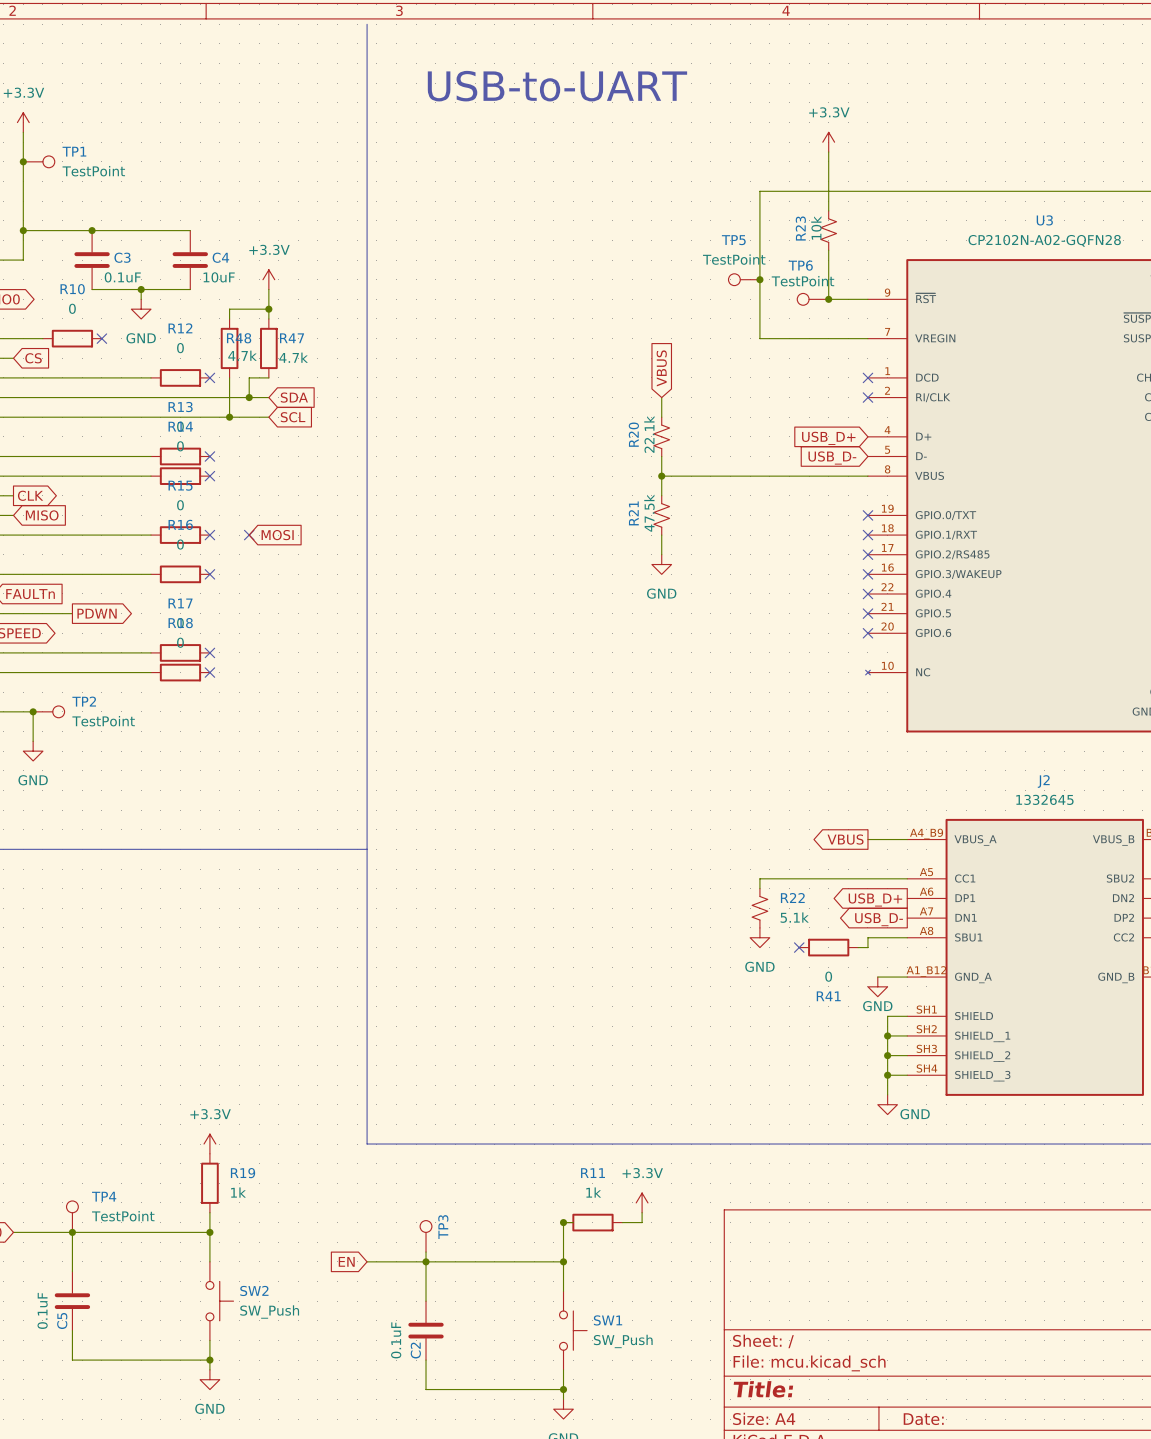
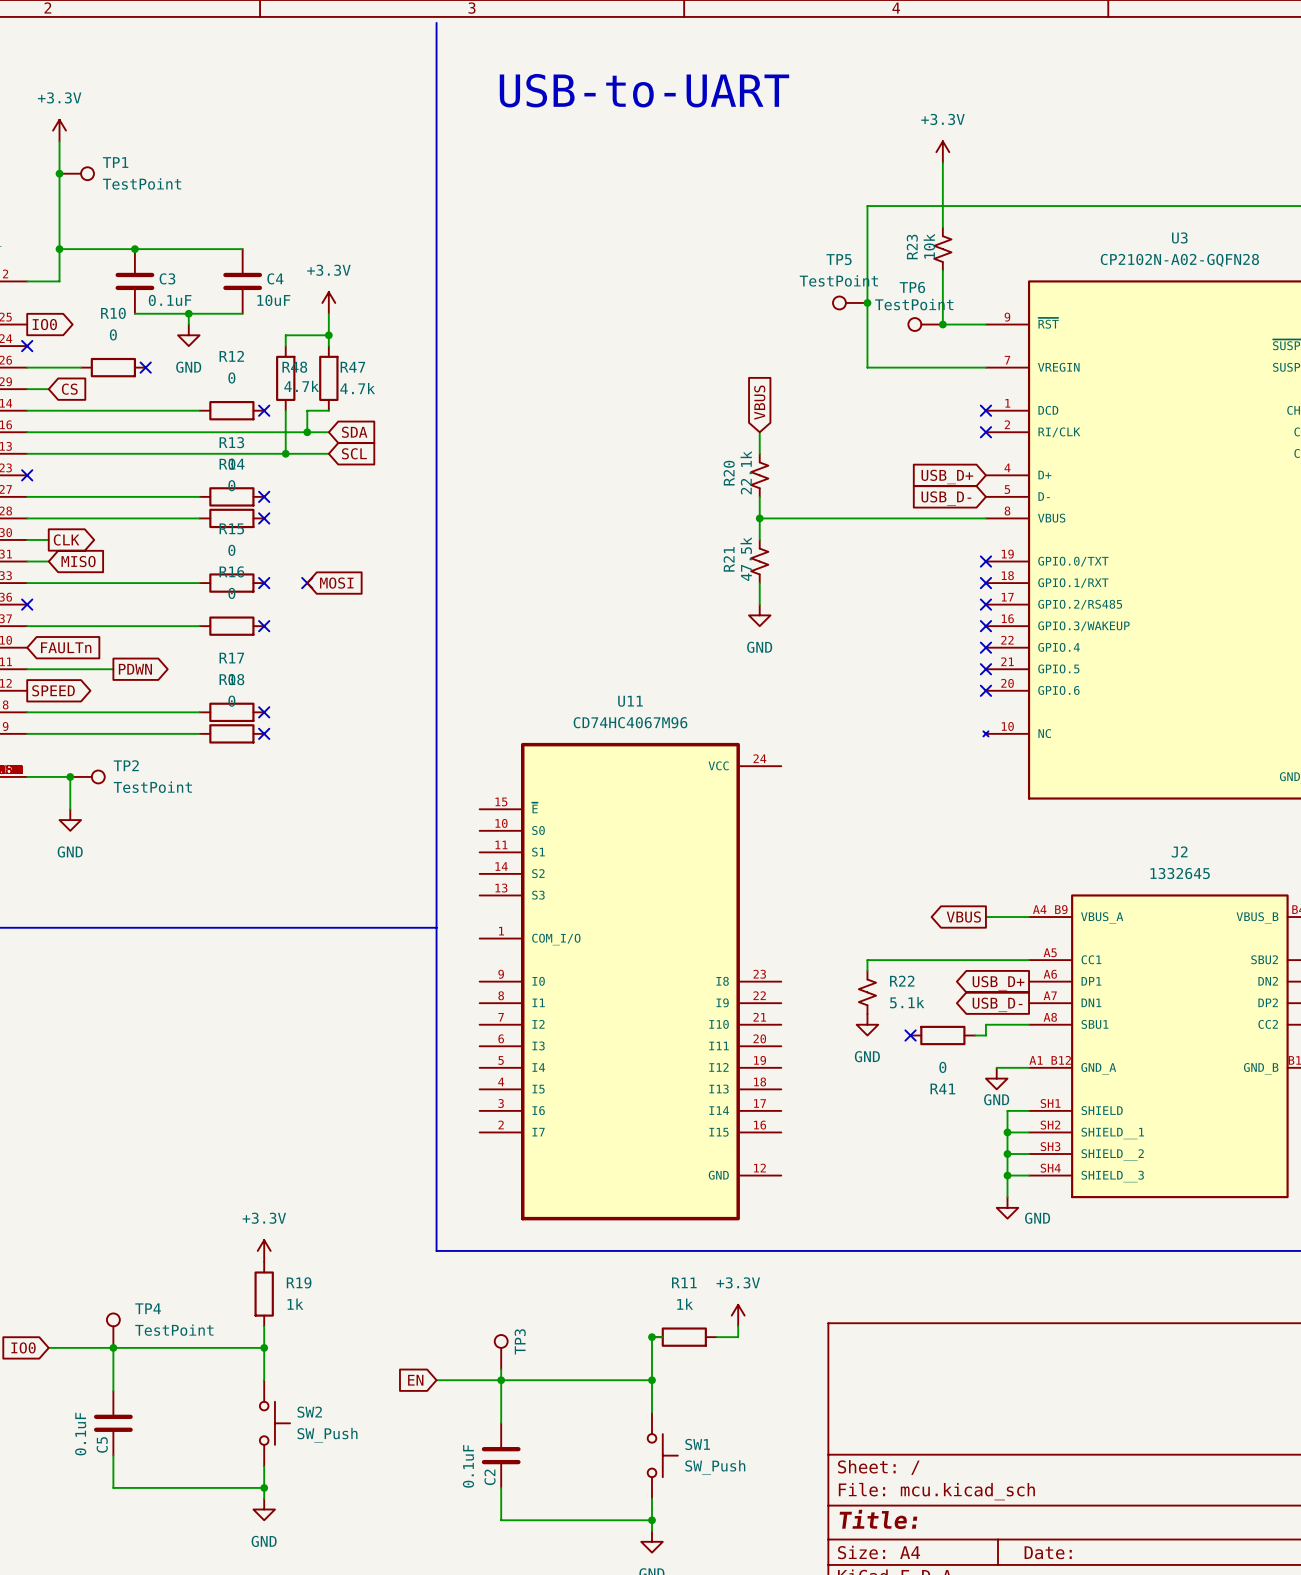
U11: none -> CD74HC4067M96 (630, 981)

